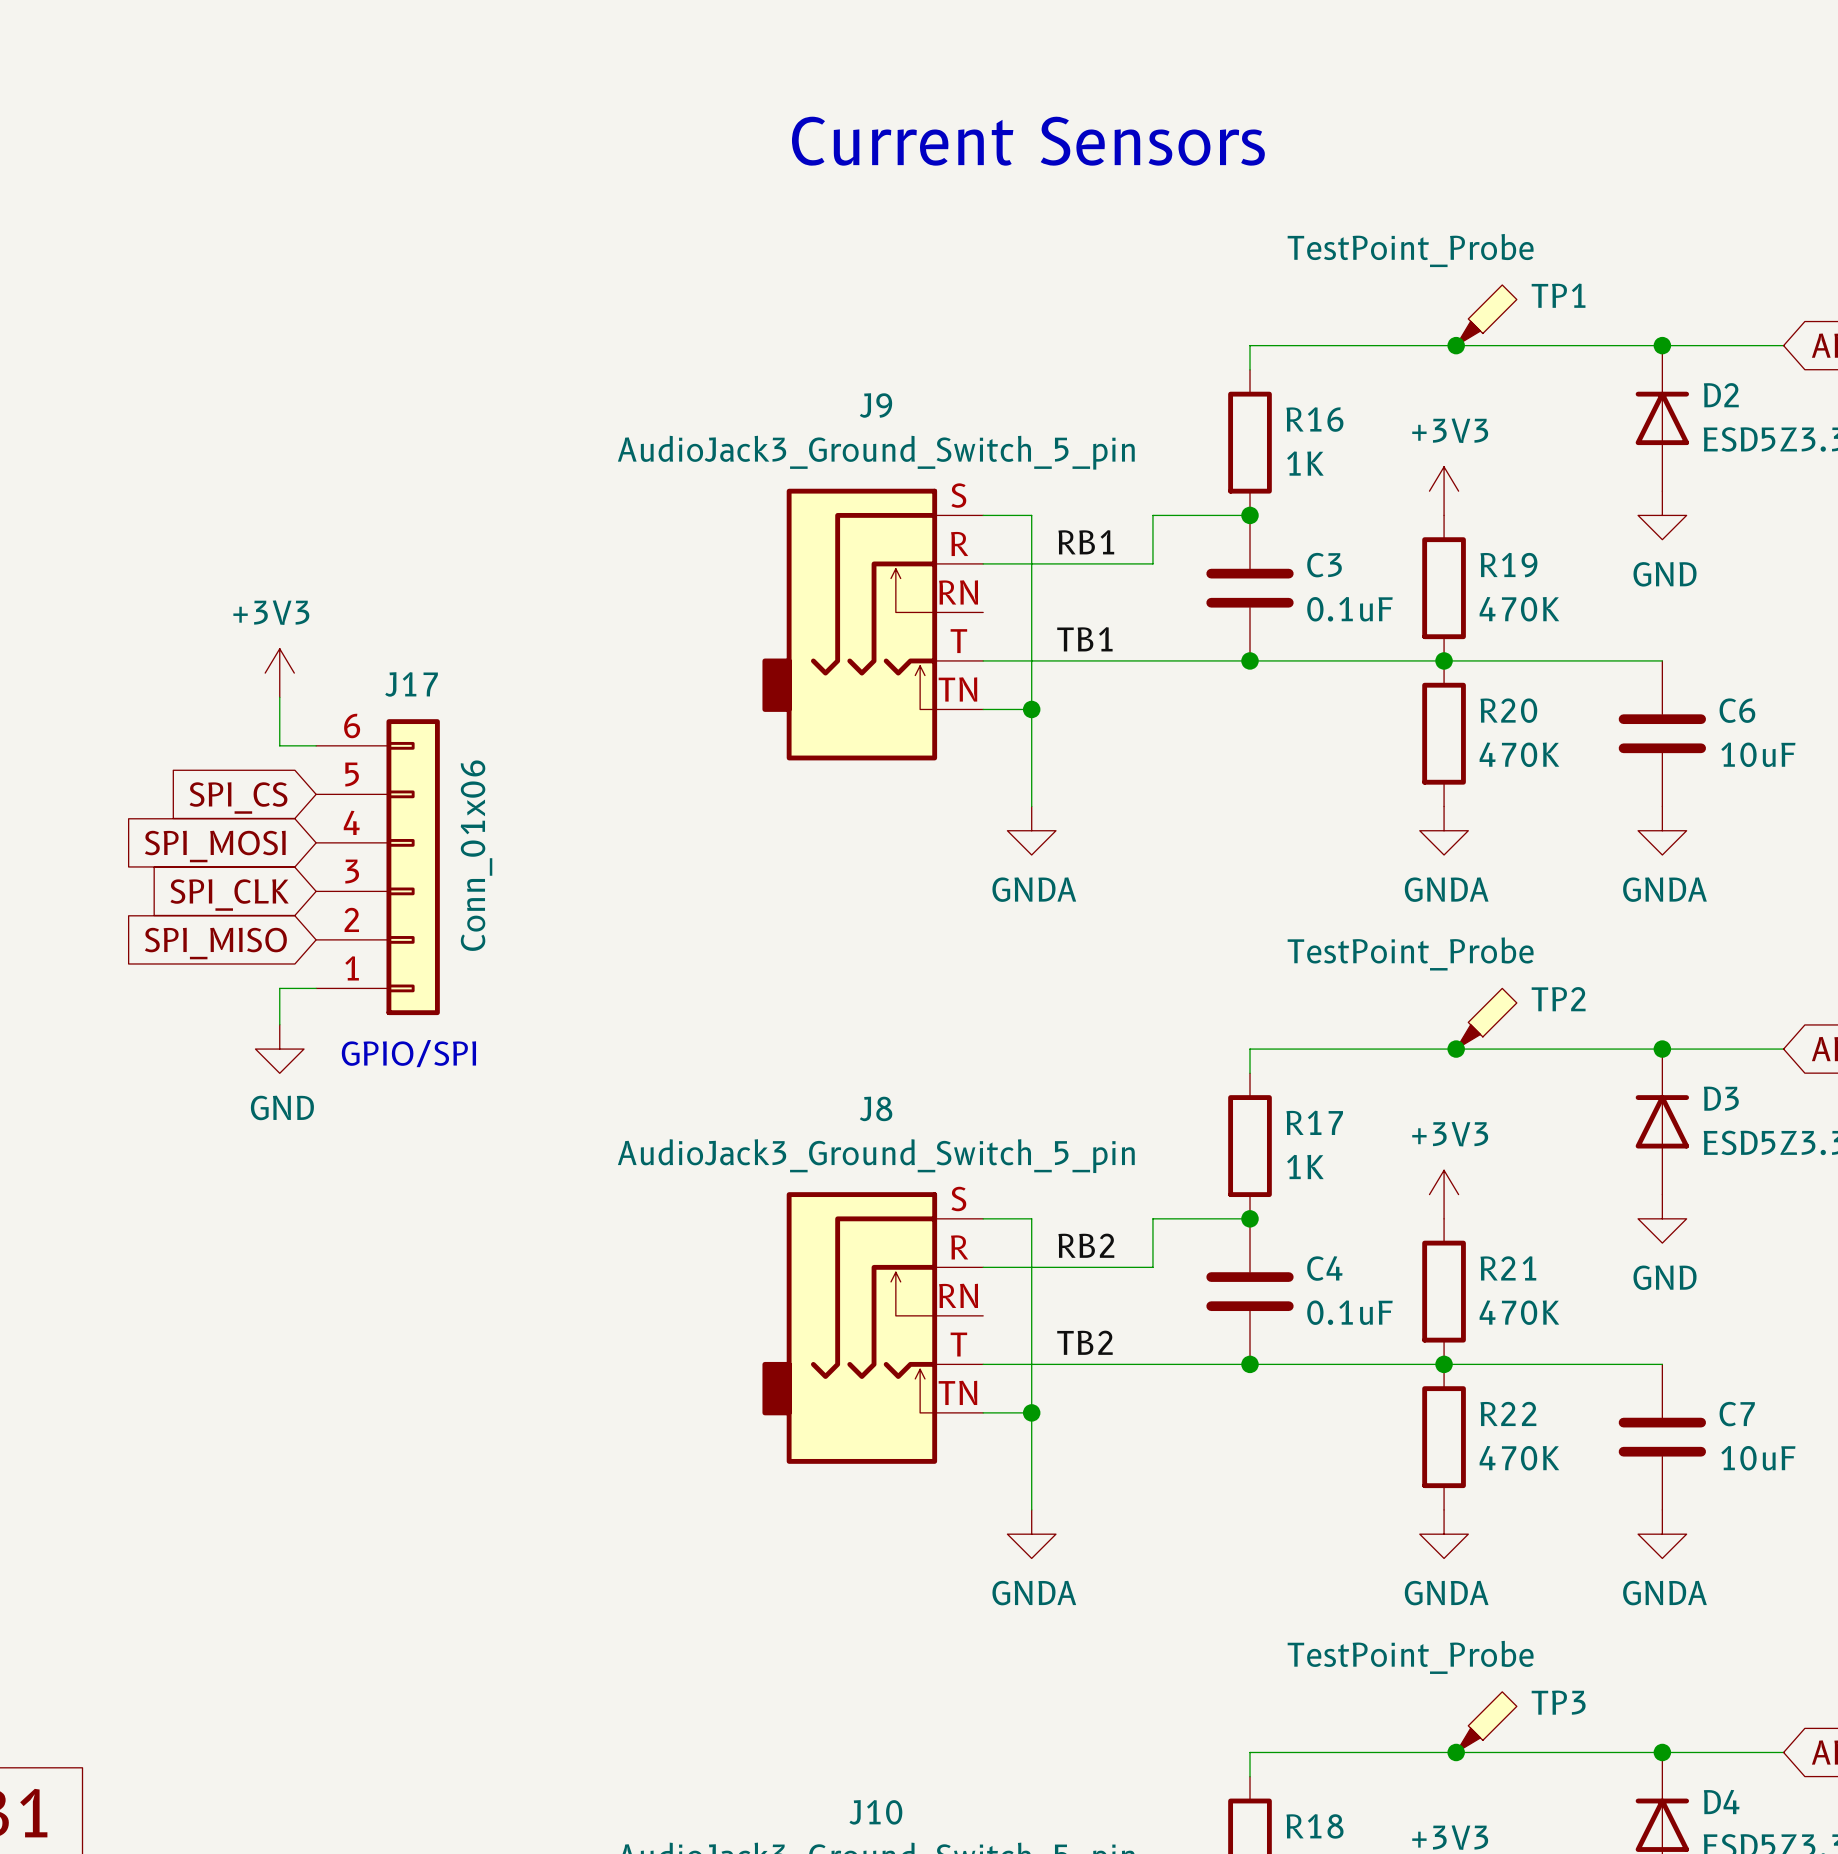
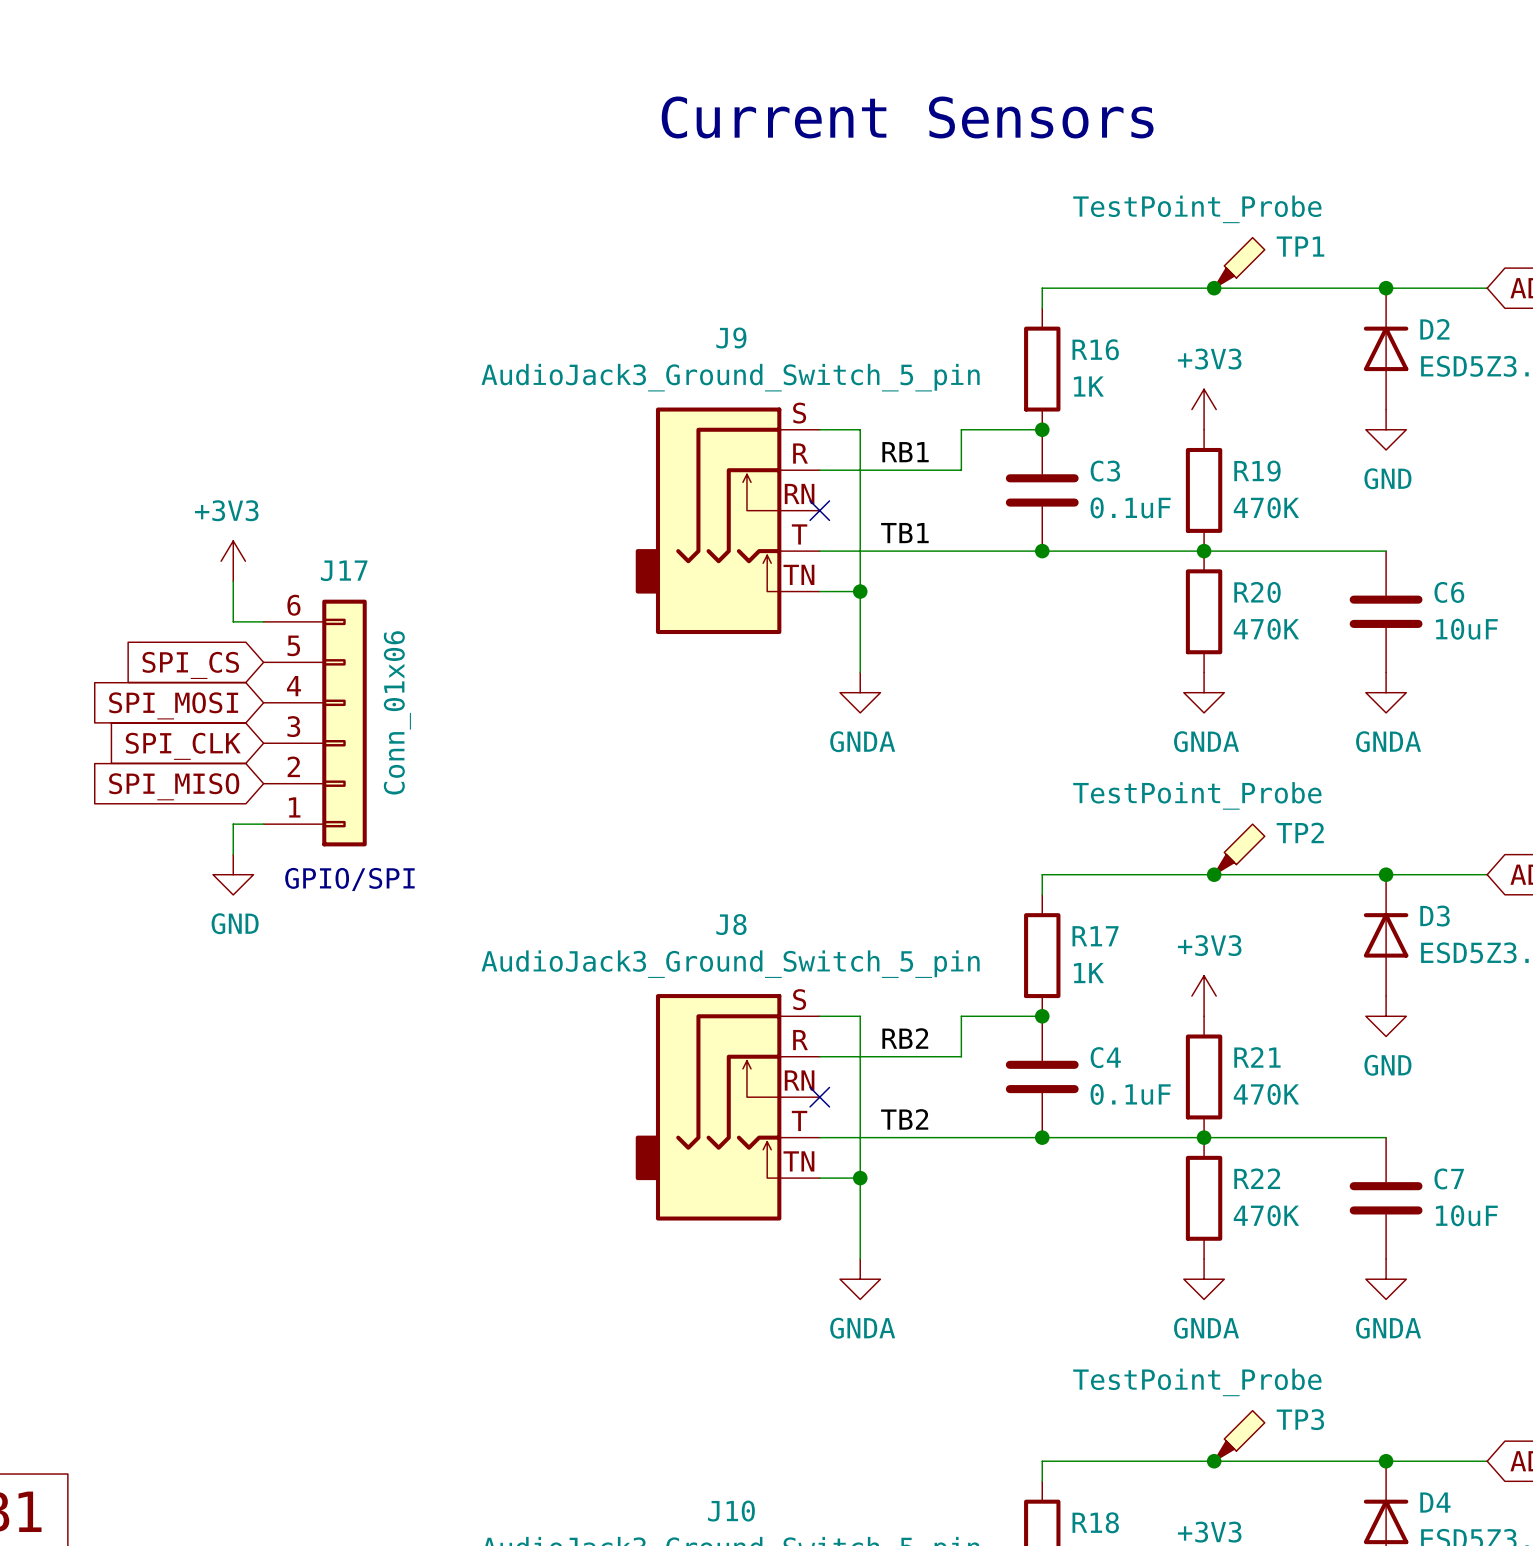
no-connect mark: none -> (819, 510)
no-connect mark: none -> (819, 1097)

